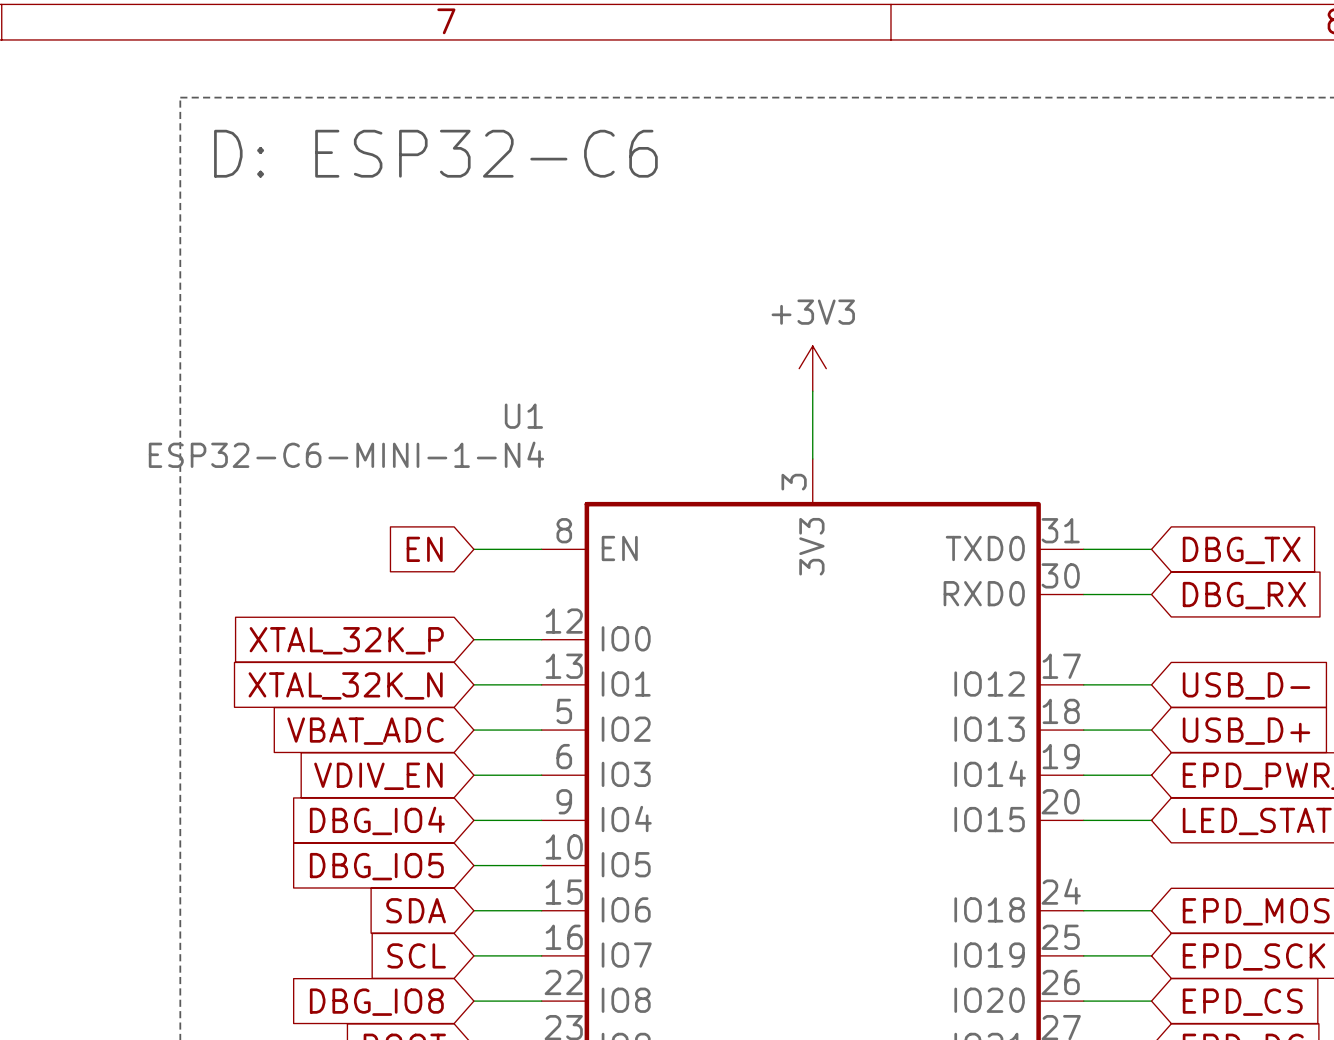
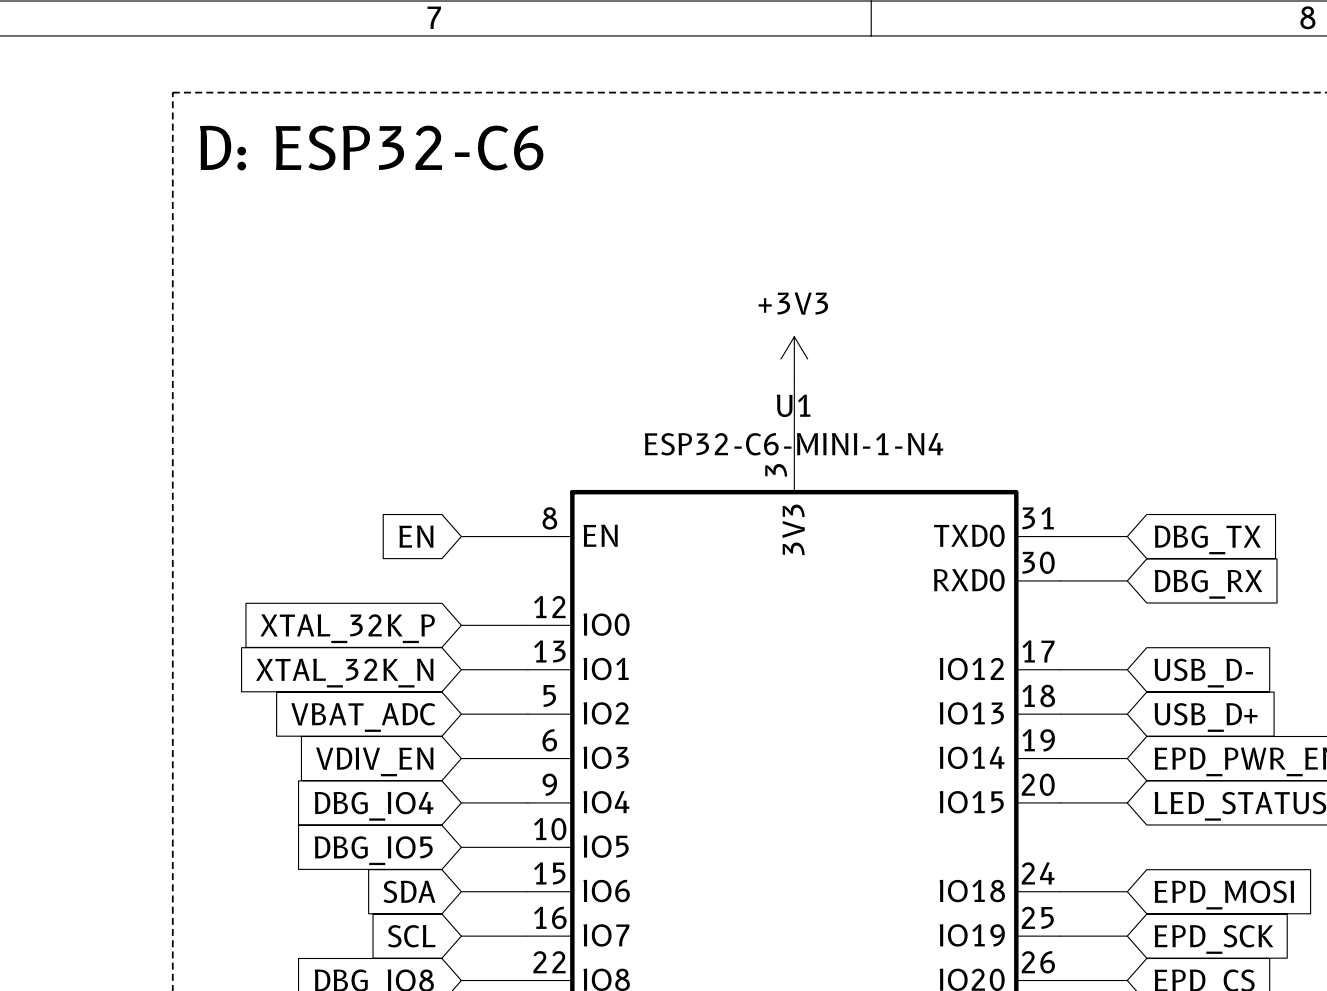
U1 name position: U1 (523, 416) -> U1 (793, 405)
U1 value position: ESP32-C6-MINI-1-N4 (346, 454) -> ESP32-C6-MINI-1-N4 (794, 444)

